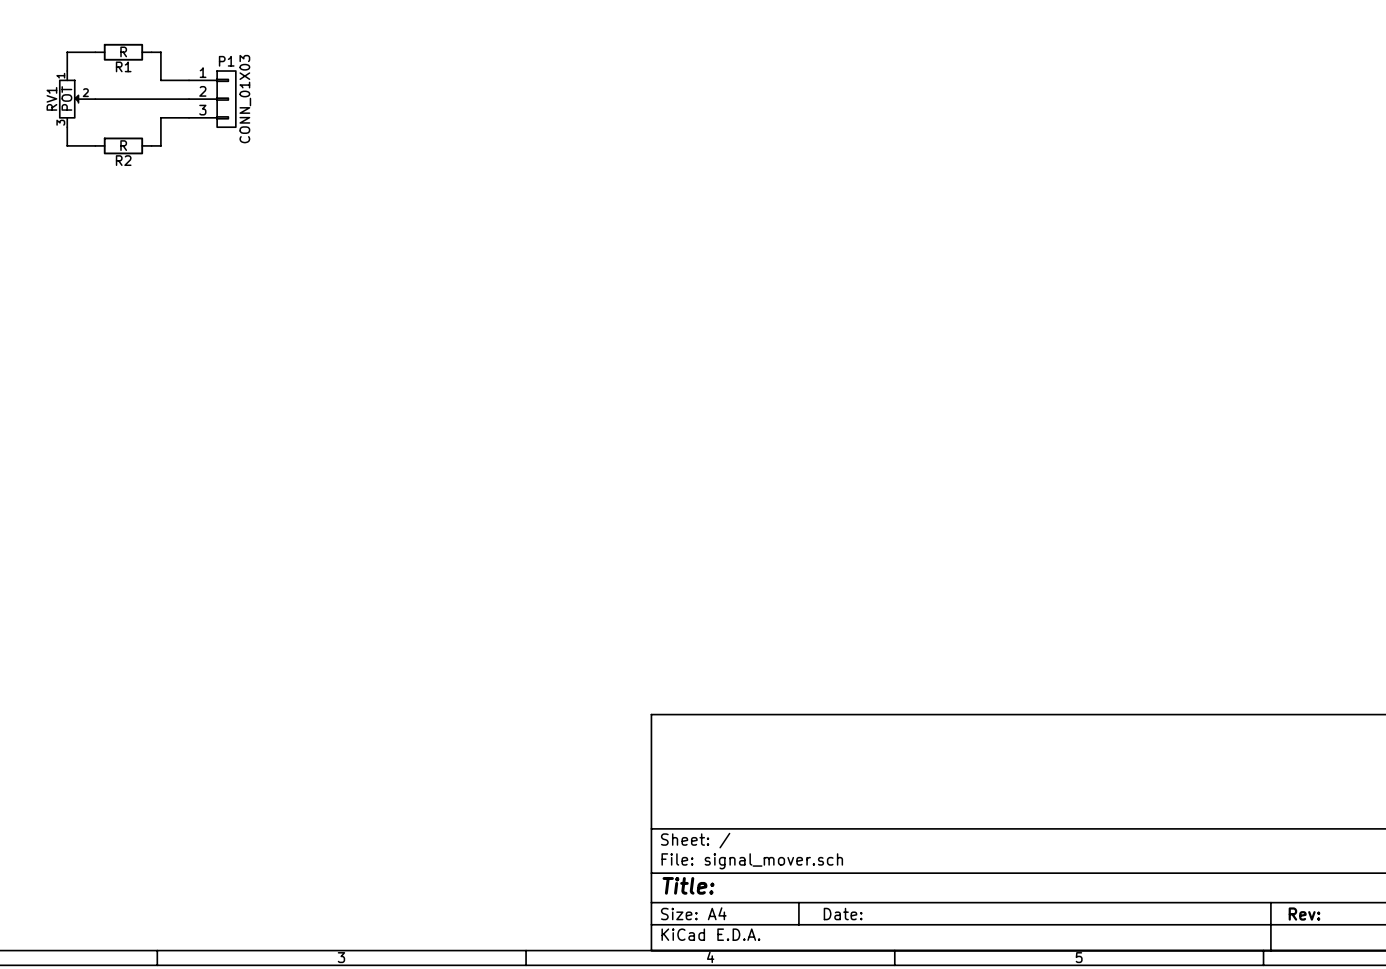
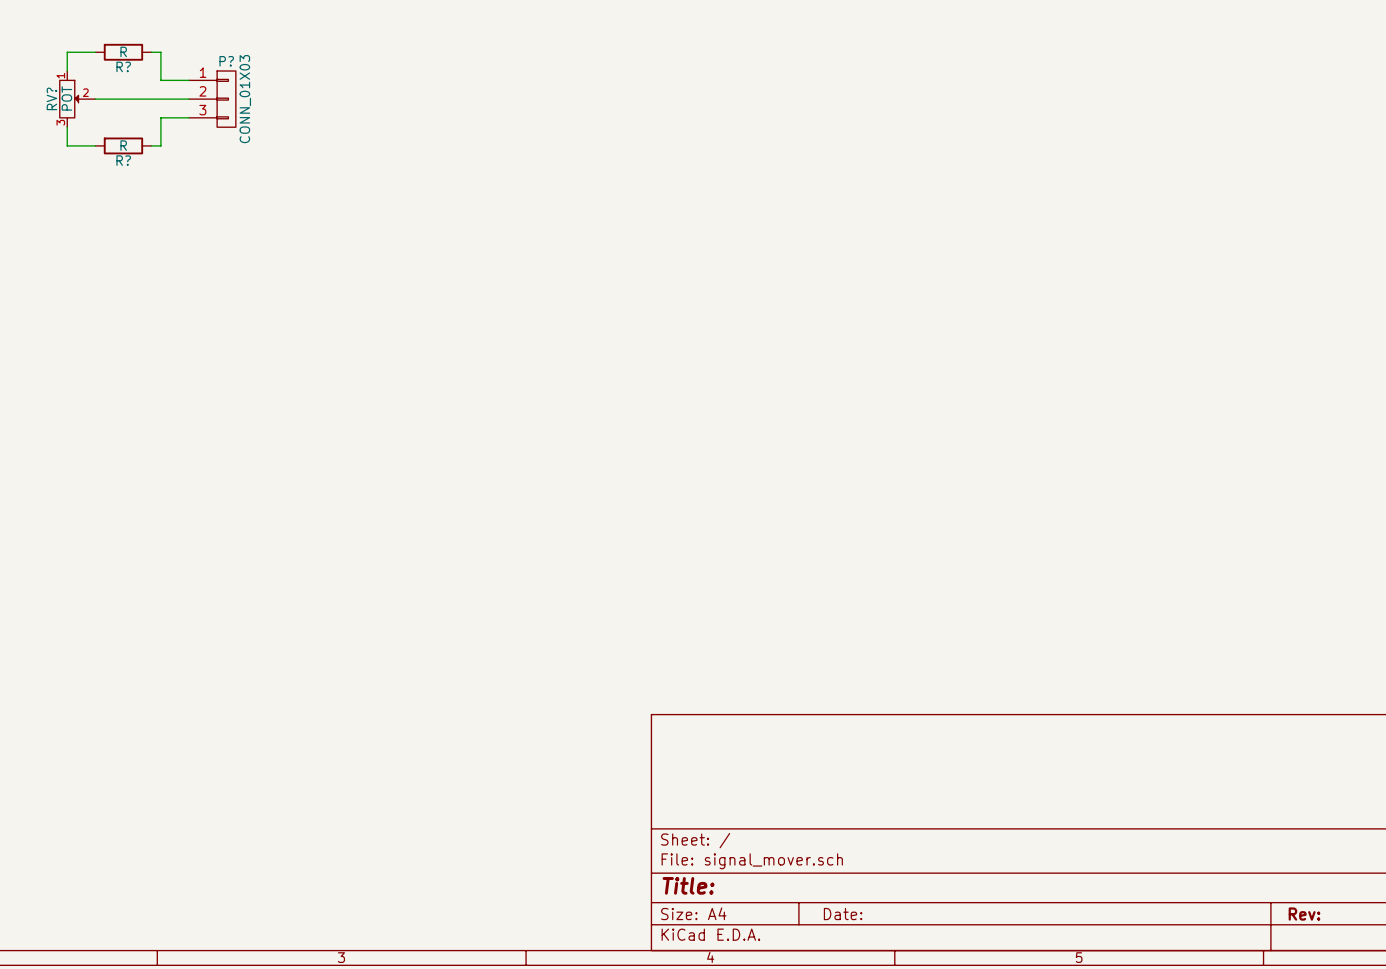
P1 name: P1 (226, 61) -> P? (226, 61)
R1 name: R1 (123, 66) -> R? (123, 66)
RV1 name: RV1 (51, 98) -> RV? (51, 98)
R2 name: R2 (123, 160) -> R? (123, 160)

